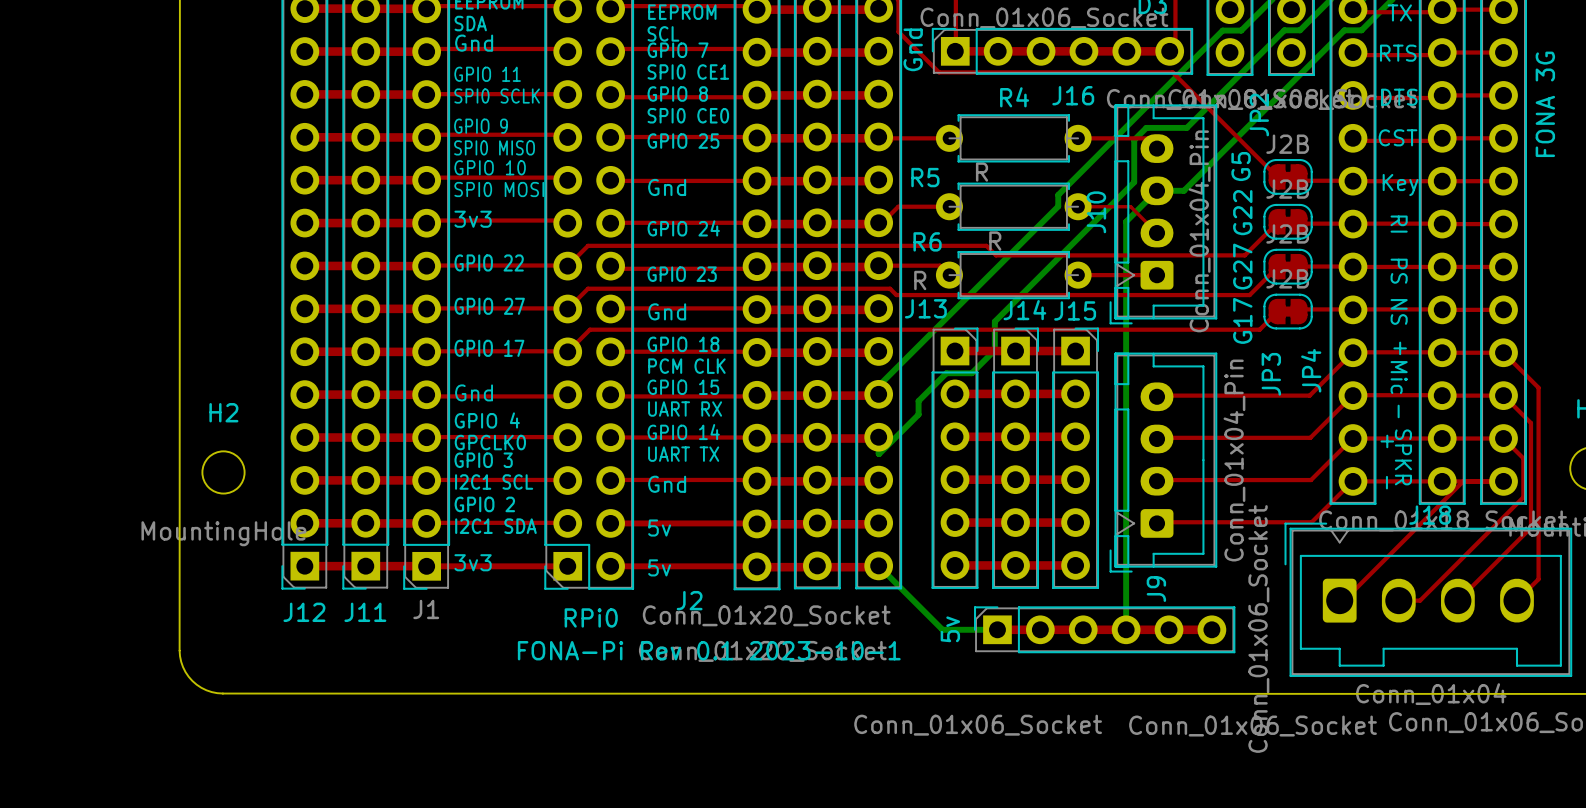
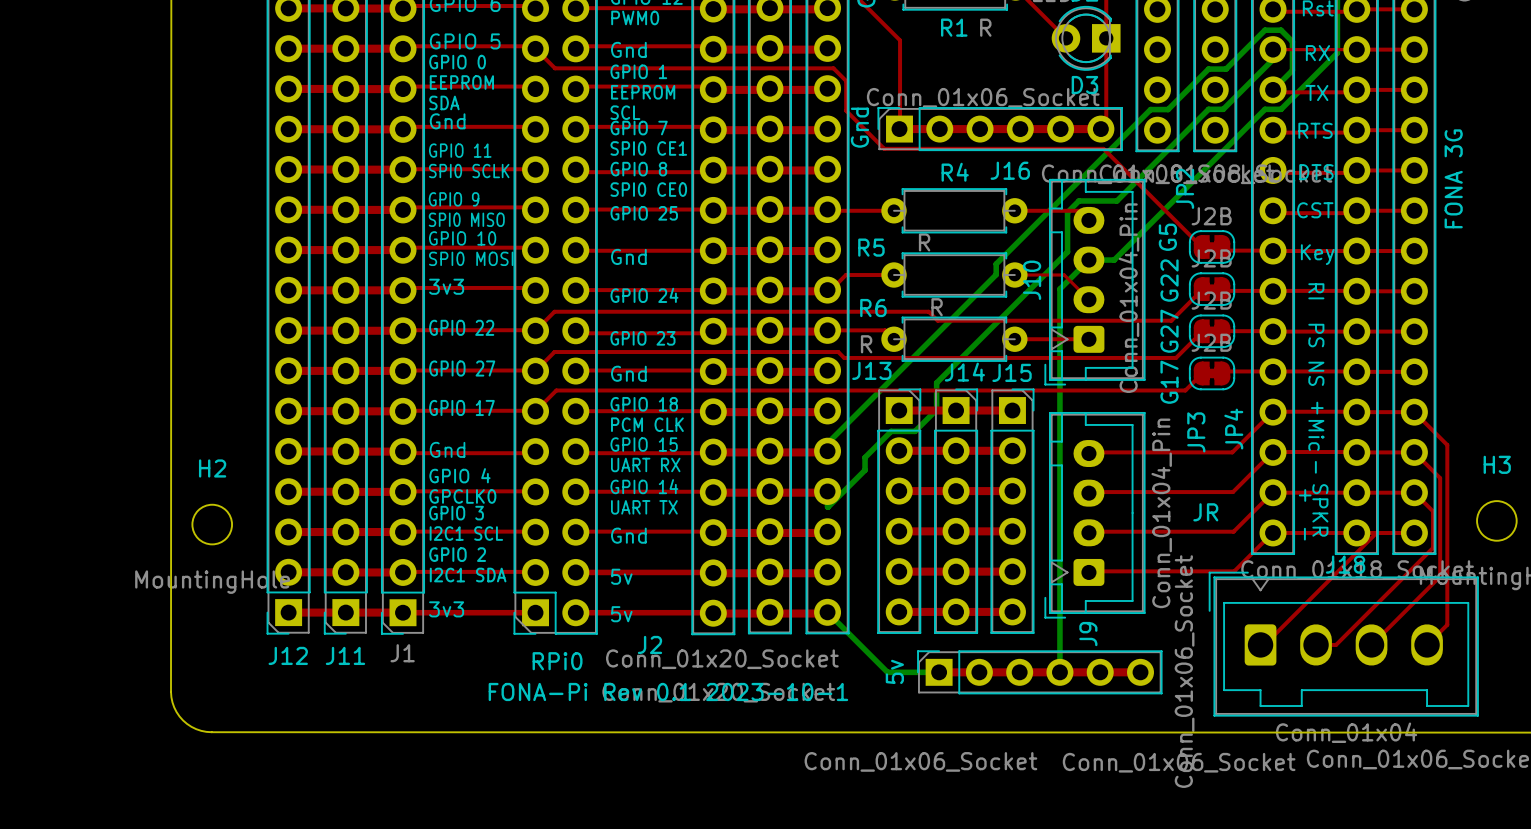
text: none -> JR (1205, 512)

